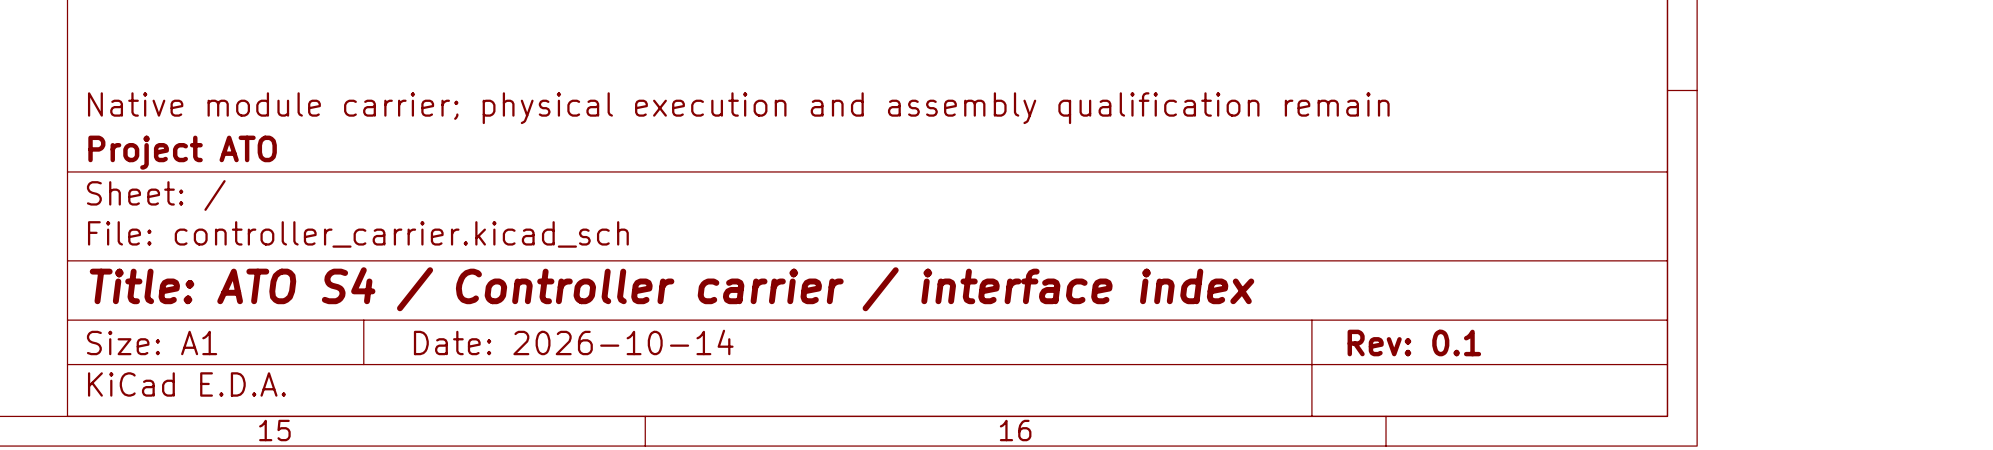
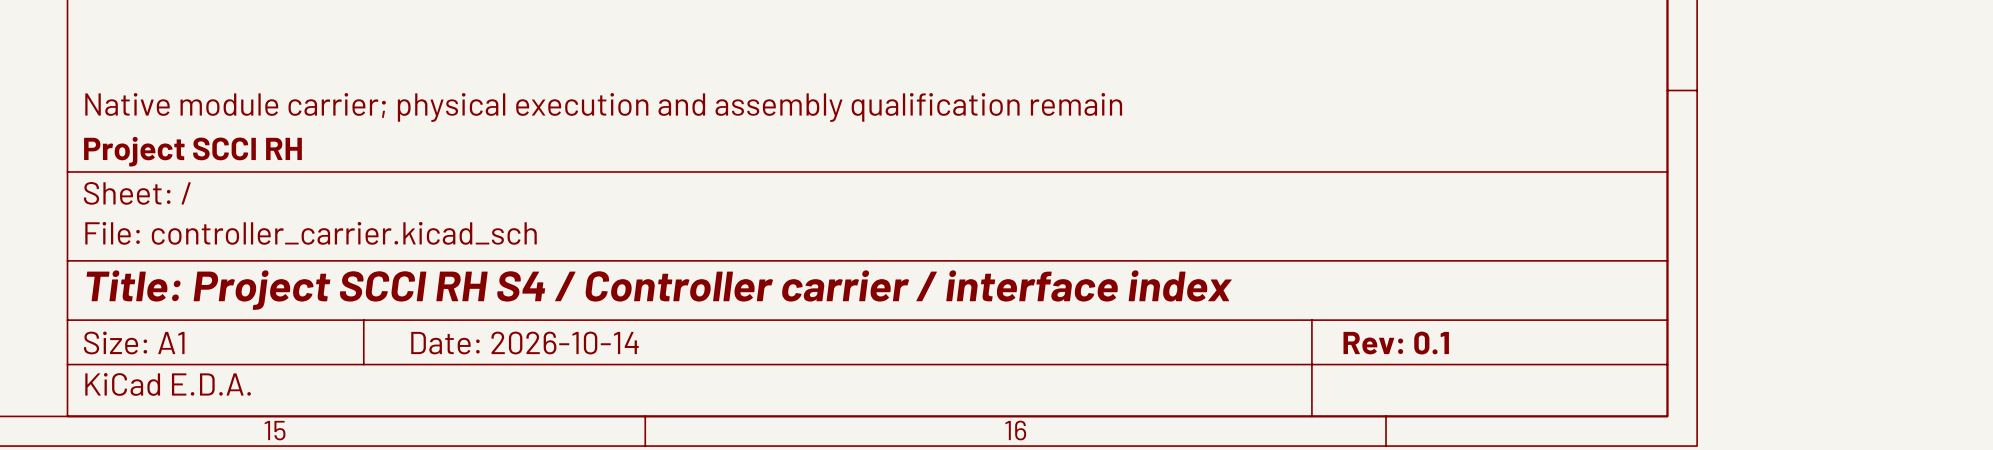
title block: Project ATO (182, 152) -> Project SCCI RH (192, 151)
title block: Title: ATO S4 / Controller carrier / interface index (672, 289) -> Title: Project SCCI RH S4 / Controller carrier / interface index (659, 290)

